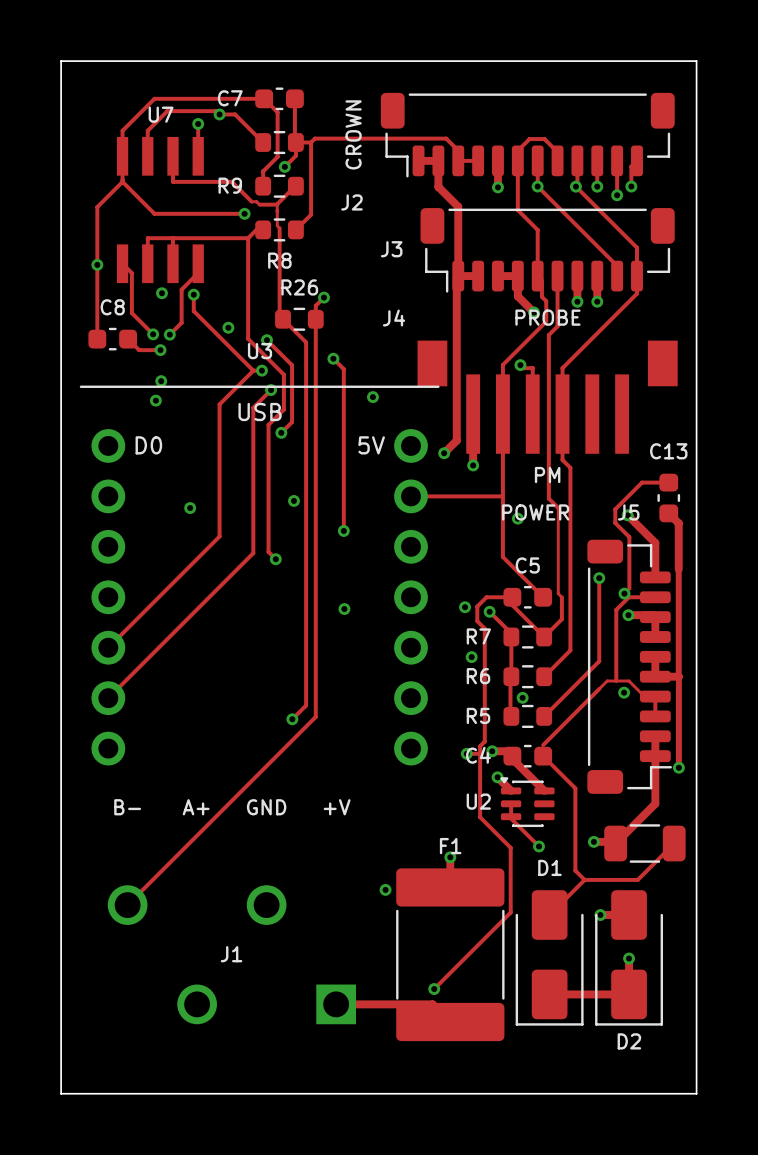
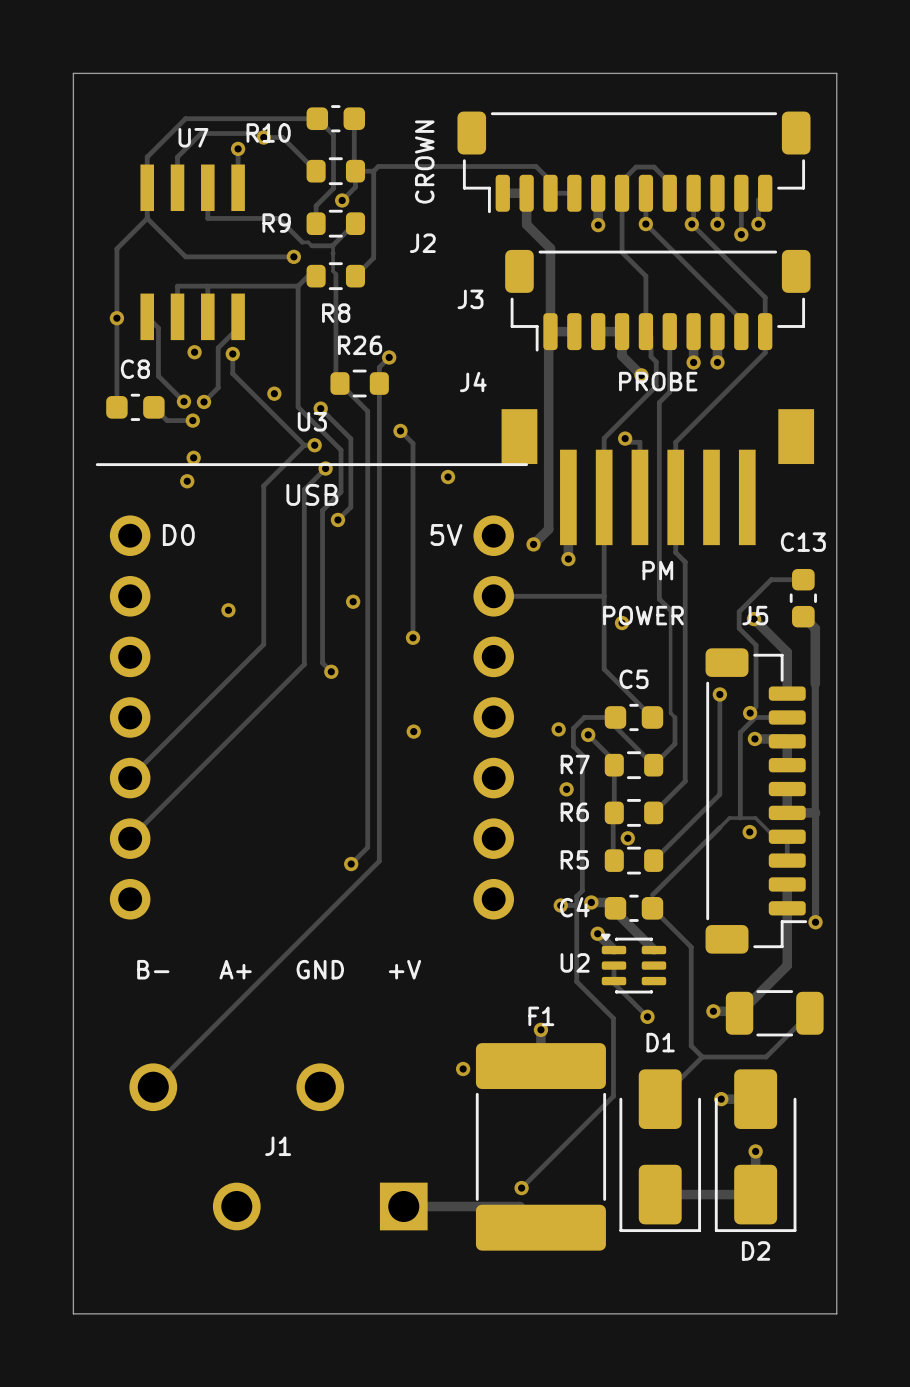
C7 name: C7 (230, 98) -> none
R10 name: none -> R10 (268, 132)

